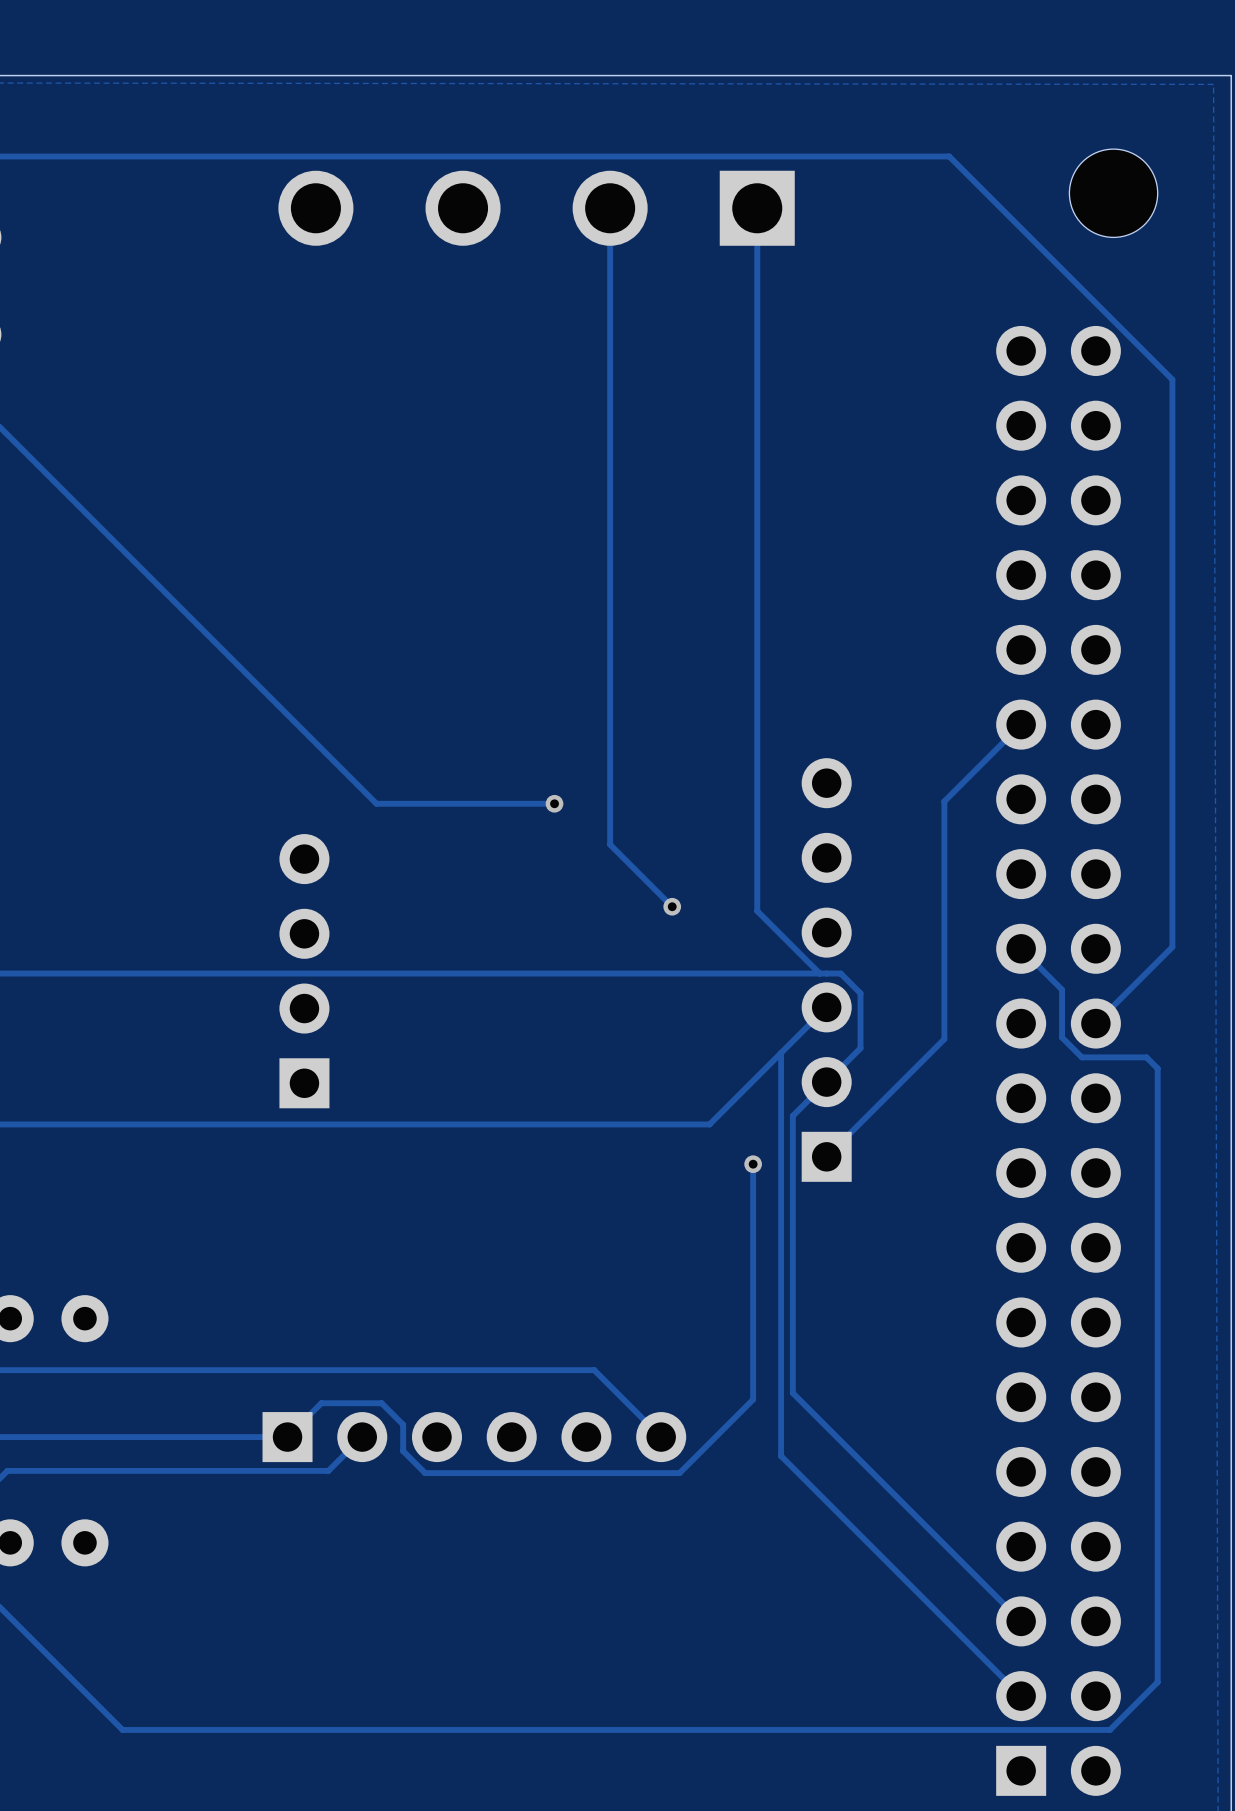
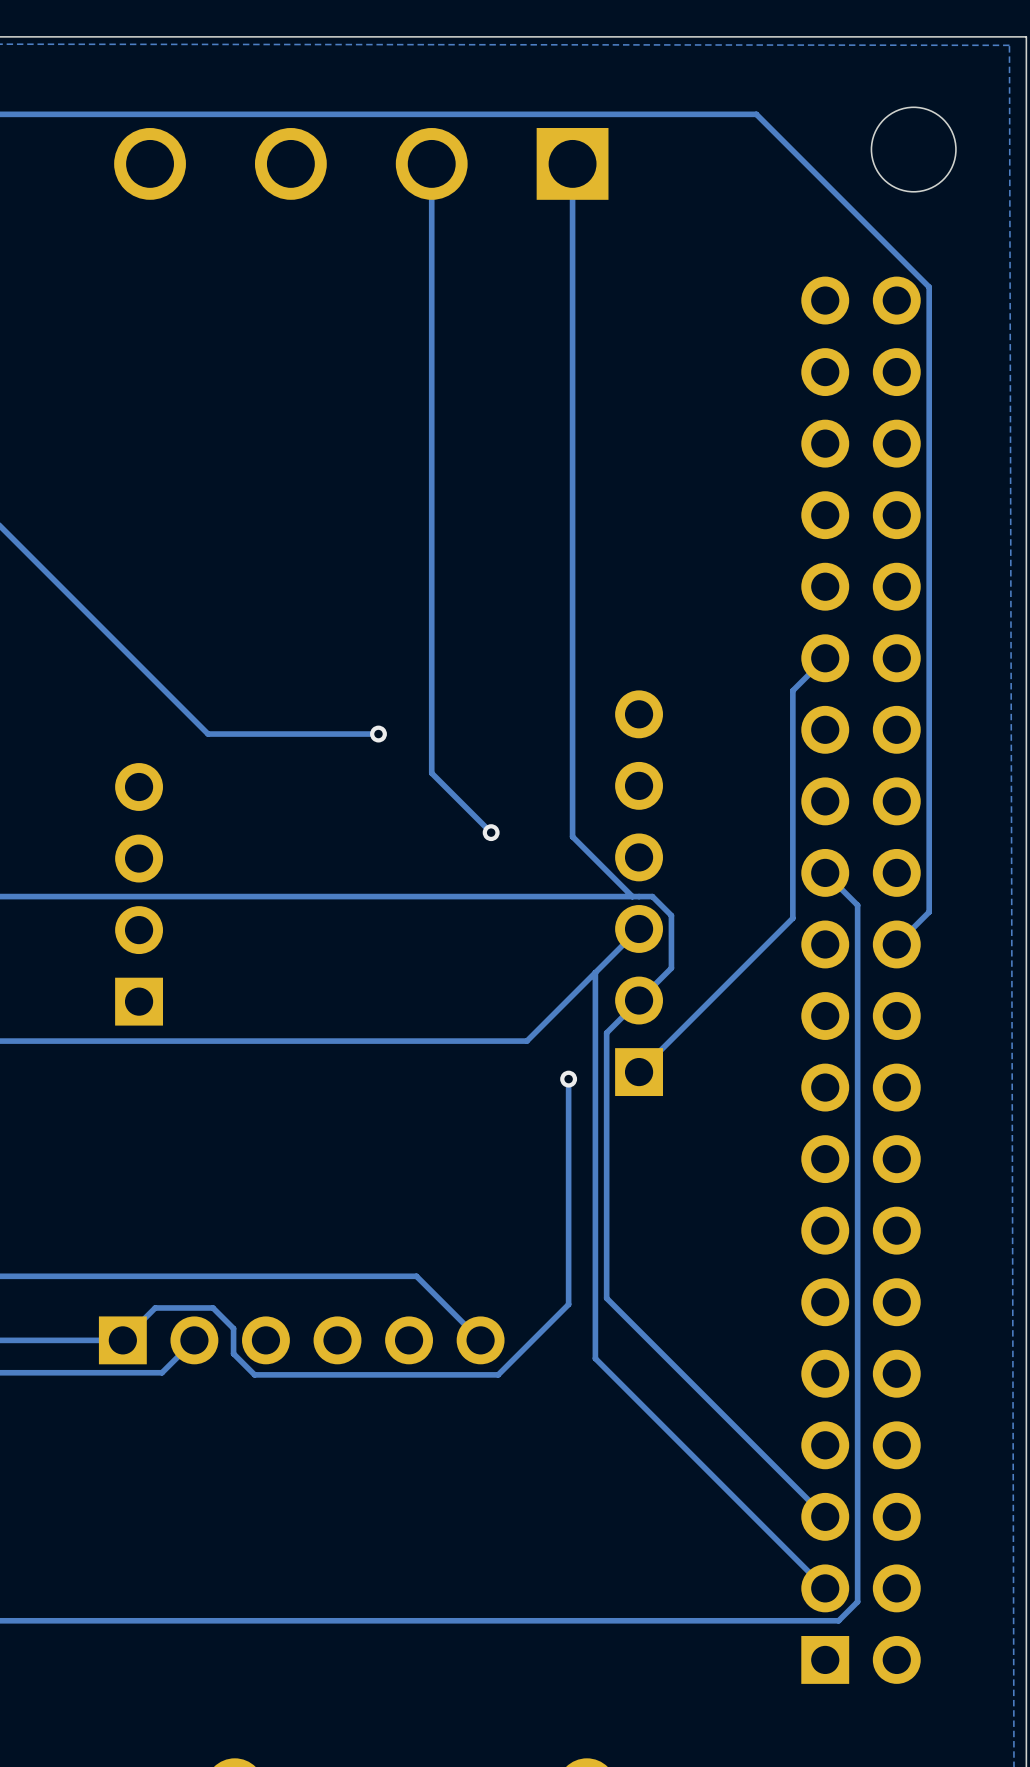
track: (1129, 336) (1172, 379) (1172, 947) (1129, 989) -> (929, 287) (929, 912)
track: (987, 758) (944, 801) (944, 1039) -> (792, 690) (792, 918) (751, 959)
track: (1055, 982) (1062, 989) (1062, 1037) (1081, 1057) (1146, 1057) (1157, 1068) (1157, 1682) (1109, 1729) (1035, 1729) -> (857, 905) (857, 1601) (838, 1620)

